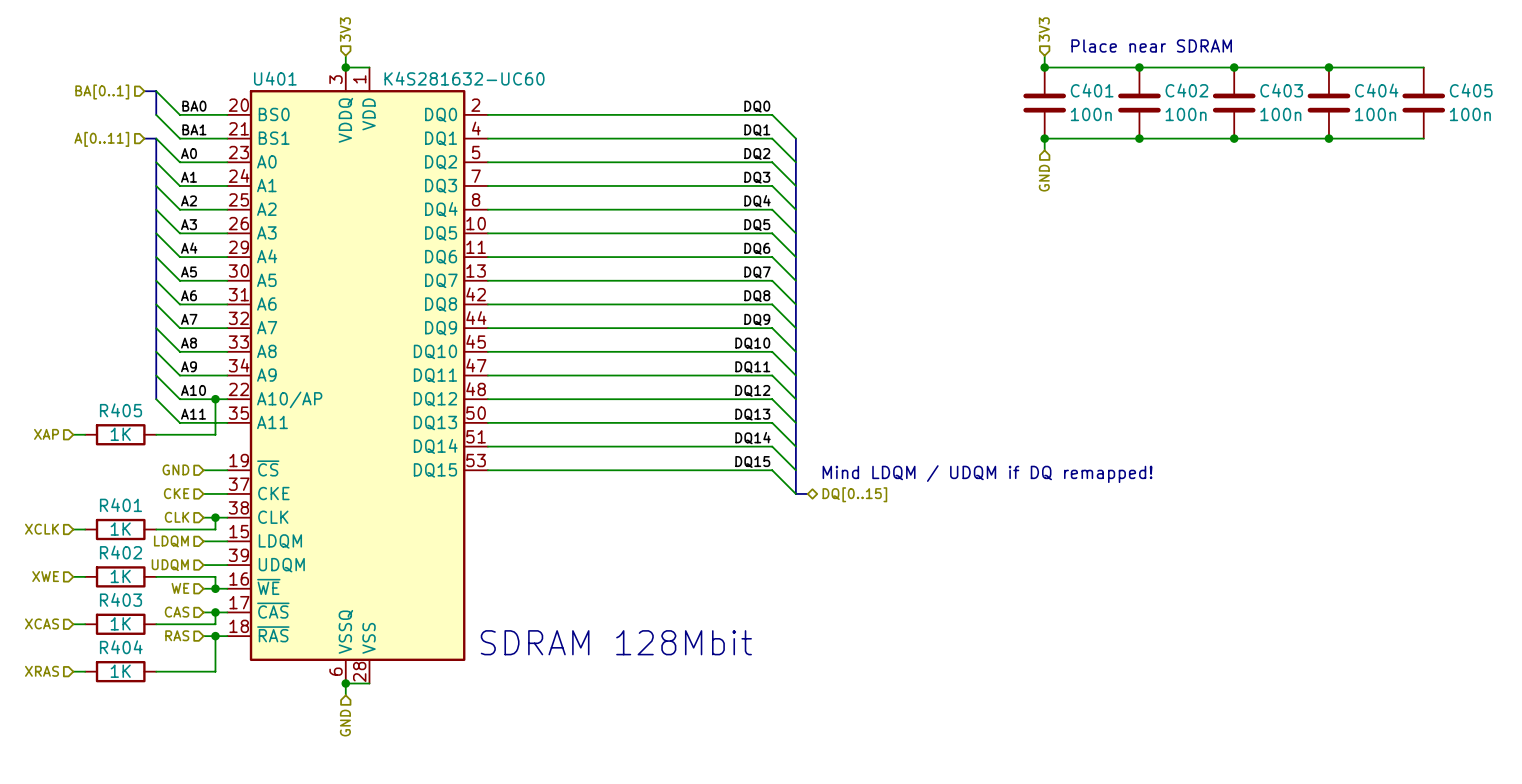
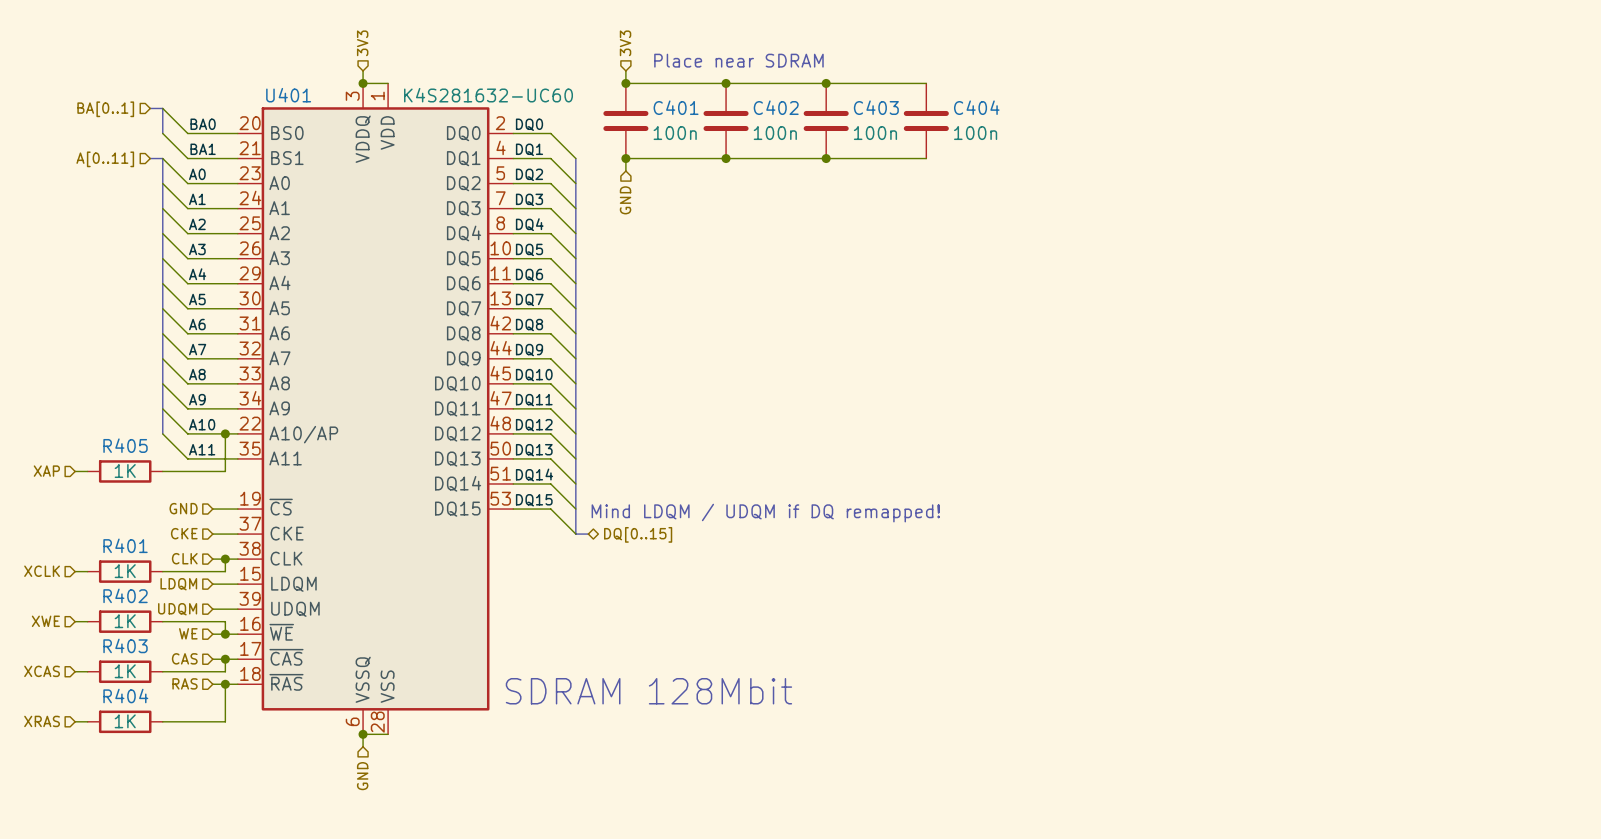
hierarchical label: none -> 3V3 (625, 43)
hierarchical label: 3V3 (1044, 29) -> none
text: none -> Place near SDRAM (738, 60)
text: Place near SDRAM (1151, 45) -> none
wire: none -> (625, 70) (625, 83) (926, 83)
wire: (1044, 55) (1044, 67) (1423, 67) -> none
junction: none -> (625, 83)
junction: none -> (726, 83)
junction: none -> (826, 83)
junction: (1044, 67) -> none
junction: (1139, 67) -> none
junction: (1234, 67) -> none
junction: (1328, 67) -> none
C401 position: (1044, 103) -> (625, 120)
C402 position: (1139, 103) -> (726, 120)
C403 position: (1234, 103) -> (826, 120)
C404 position: (1328, 103) -> (926, 120)
C405: 100n (1423, 103) -> none
label: none -> DQ0 (529, 124)
label: DQ0 (757, 106) -> none
wire: (523, 114) (772, 114) (795, 138) -> (550, 133) (575, 158)
label: none -> DQ1 (529, 149)
label: DQ1 (757, 130) -> none
wire: (523, 138) (594, 138) -> (550, 158) (575, 183)
bus: none -> (575, 158) (575, 534) (588, 534)
wire: none -> (625, 158) (625, 171)
junction: none -> (625, 158)
junction: none -> (726, 158)
wire: (772, 138) (795, 162) -> (813, 158) (926, 158)
junction: none -> (826, 158)
bus: (795, 138) (795, 493) (807, 493) -> none
junction: (1044, 138) -> none
junction: (1139, 138) -> none
junction: (1234, 138) -> none
junction: (1328, 138) -> none
wire: (1423, 138) (1044, 138) (1044, 150) -> none
label: none -> DQ2 (529, 174)
label: DQ2 (757, 154) -> none
wire: (523, 162) (772, 162) (795, 185) -> (550, 183) (575, 208)
label: none -> DQ3 (529, 199)
label: DQ3 (757, 177) -> none
hierarchical label: none -> GND (625, 200)
hierarchical label: GND (1044, 178) -> none
wire: (523, 185) (772, 185) (795, 209) -> (550, 208) (575, 233)
label: none -> DQ4 (529, 224)
label: DQ4 (757, 201) -> none
wire: (523, 209) (772, 209) (795, 233) -> (550, 233) (575, 258)
label: none -> DQ5 (529, 249)
label: DQ5 (757, 225) -> none
wire: (523, 233) (772, 233) (795, 257) -> (550, 258) (575, 283)
label: none -> DQ6 (529, 274)
label: DQ6 (757, 248) -> none
wire: (523, 257) (772, 257) (795, 280) -> (550, 283) (575, 308)
label: none -> DQ7 (529, 299)
label: DQ7 (757, 272) -> none
wire: (523, 280) (772, 280) (795, 304) -> (550, 308) (575, 333)
label: none -> DQ8 (529, 325)
label: DQ8 (757, 296) -> none
wire: (523, 304) (772, 304) (795, 328) -> (550, 333) (575, 358)
label: none -> DQ9 (529, 350)
label: DQ9 (757, 319) -> none
wire: (523, 328) (772, 328) (795, 351) -> (550, 358) (575, 383)
label: none -> DQ10 (534, 375)
label: DQ10 (752, 343) -> none
wire: (523, 351) (772, 351) (795, 375) -> (550, 383) (575, 408)
label: none -> DQ11 (534, 400)
label: DQ11 (752, 367) -> none
wire: (523, 375) (772, 375) (795, 399) -> (550, 408) (575, 433)
label: none -> DQ12 (534, 425)
label: DQ12 (752, 390) -> none
wire: (523, 399) (772, 399) (795, 422) -> (550, 433) (575, 458)
label: none -> DQ13 (534, 450)
label: DQ13 (752, 414) -> none
wire: (523, 422) (772, 422) (795, 446) -> (550, 458) (575, 483)
label: none -> DQ14 (534, 474)
label: DQ14 (753, 438) -> none
wire: (523, 446) (772, 446) (795, 470) -> (550, 483) (575, 509)
label: none -> DQ15 (534, 500)
label: DQ15 (752, 461) -> none
wire: (523, 470) (772, 470) (795, 493) -> (550, 509) (575, 534)
text: none -> Mind LDQM / UDQM if DQ remapped! (765, 513)
text: Mind LDQM / UDQM if DQ remapped! (987, 474) -> none
hierarchical label: none -> DQ[0..15] (638, 534)
hierarchical label: DQ[0..15] (854, 494) -> none

